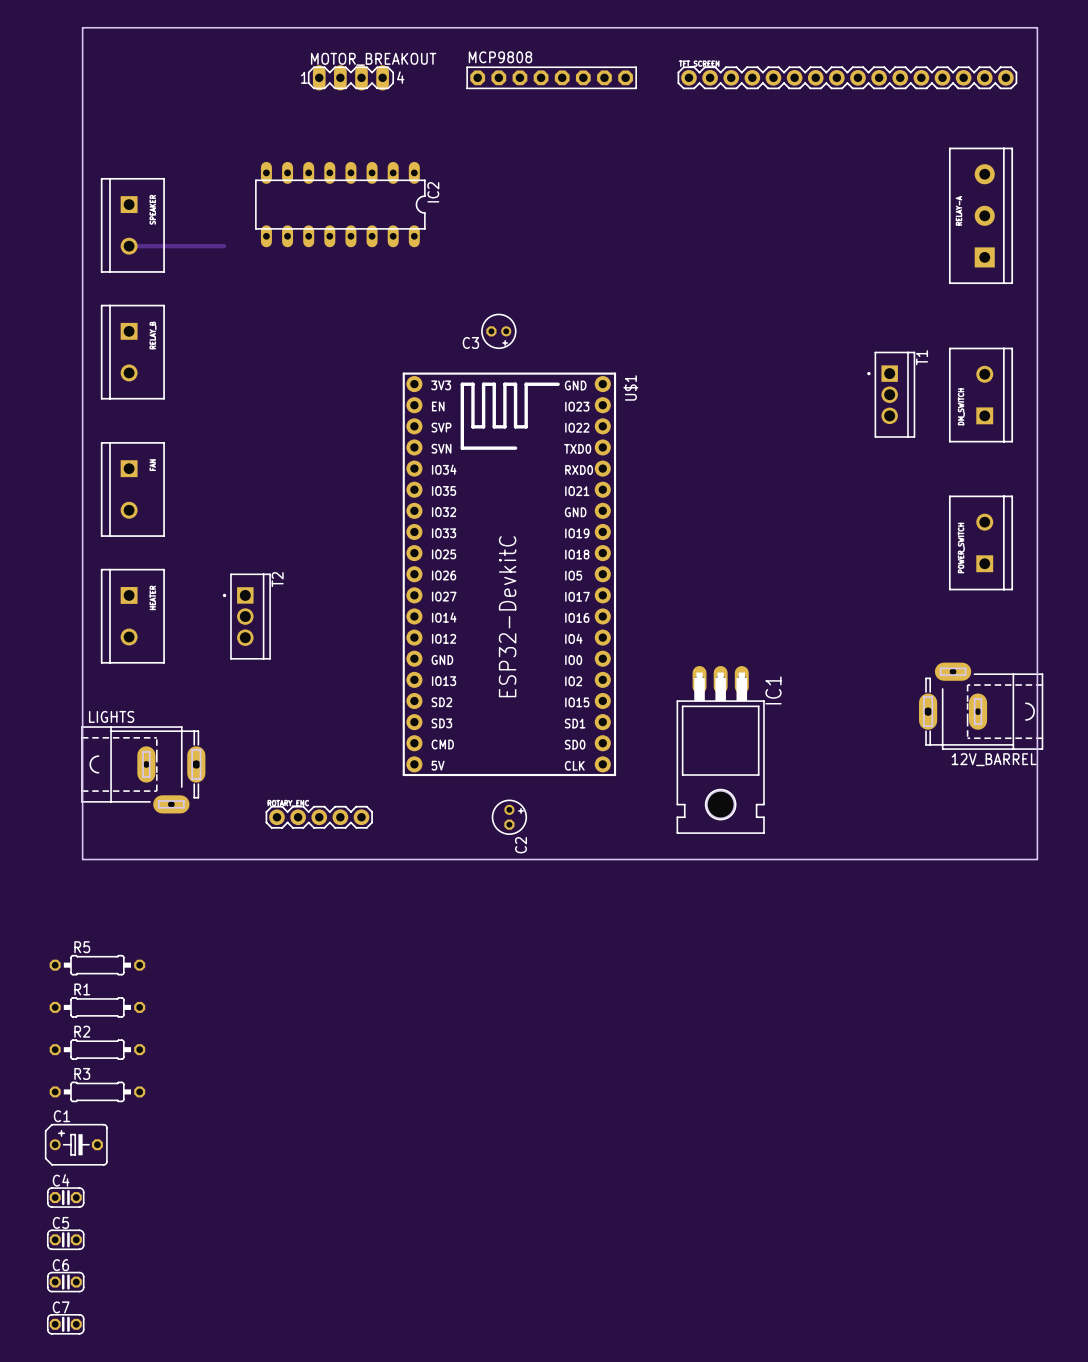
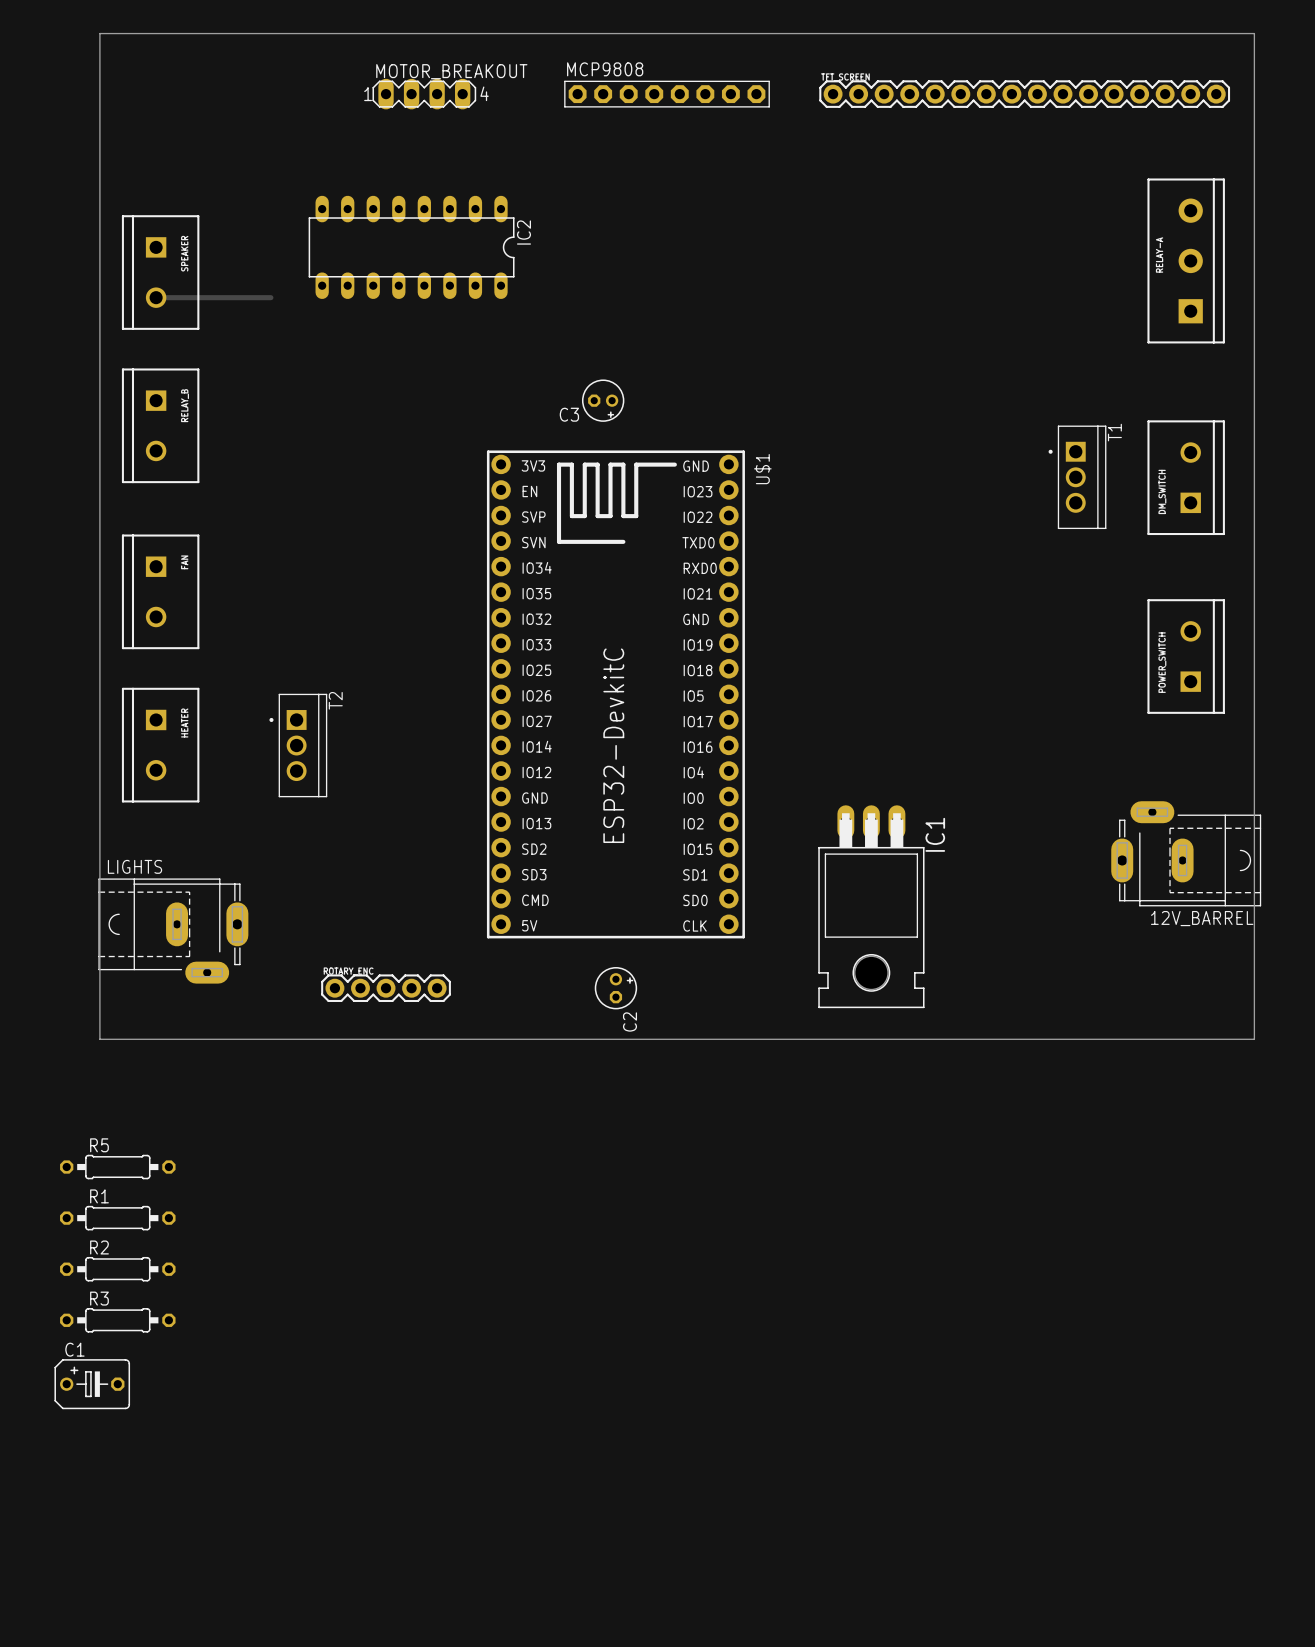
C4: (65, 1197) -> none
C5: (65, 1239) -> none
C6: (65, 1282) -> none
C7: (65, 1324) -> none

